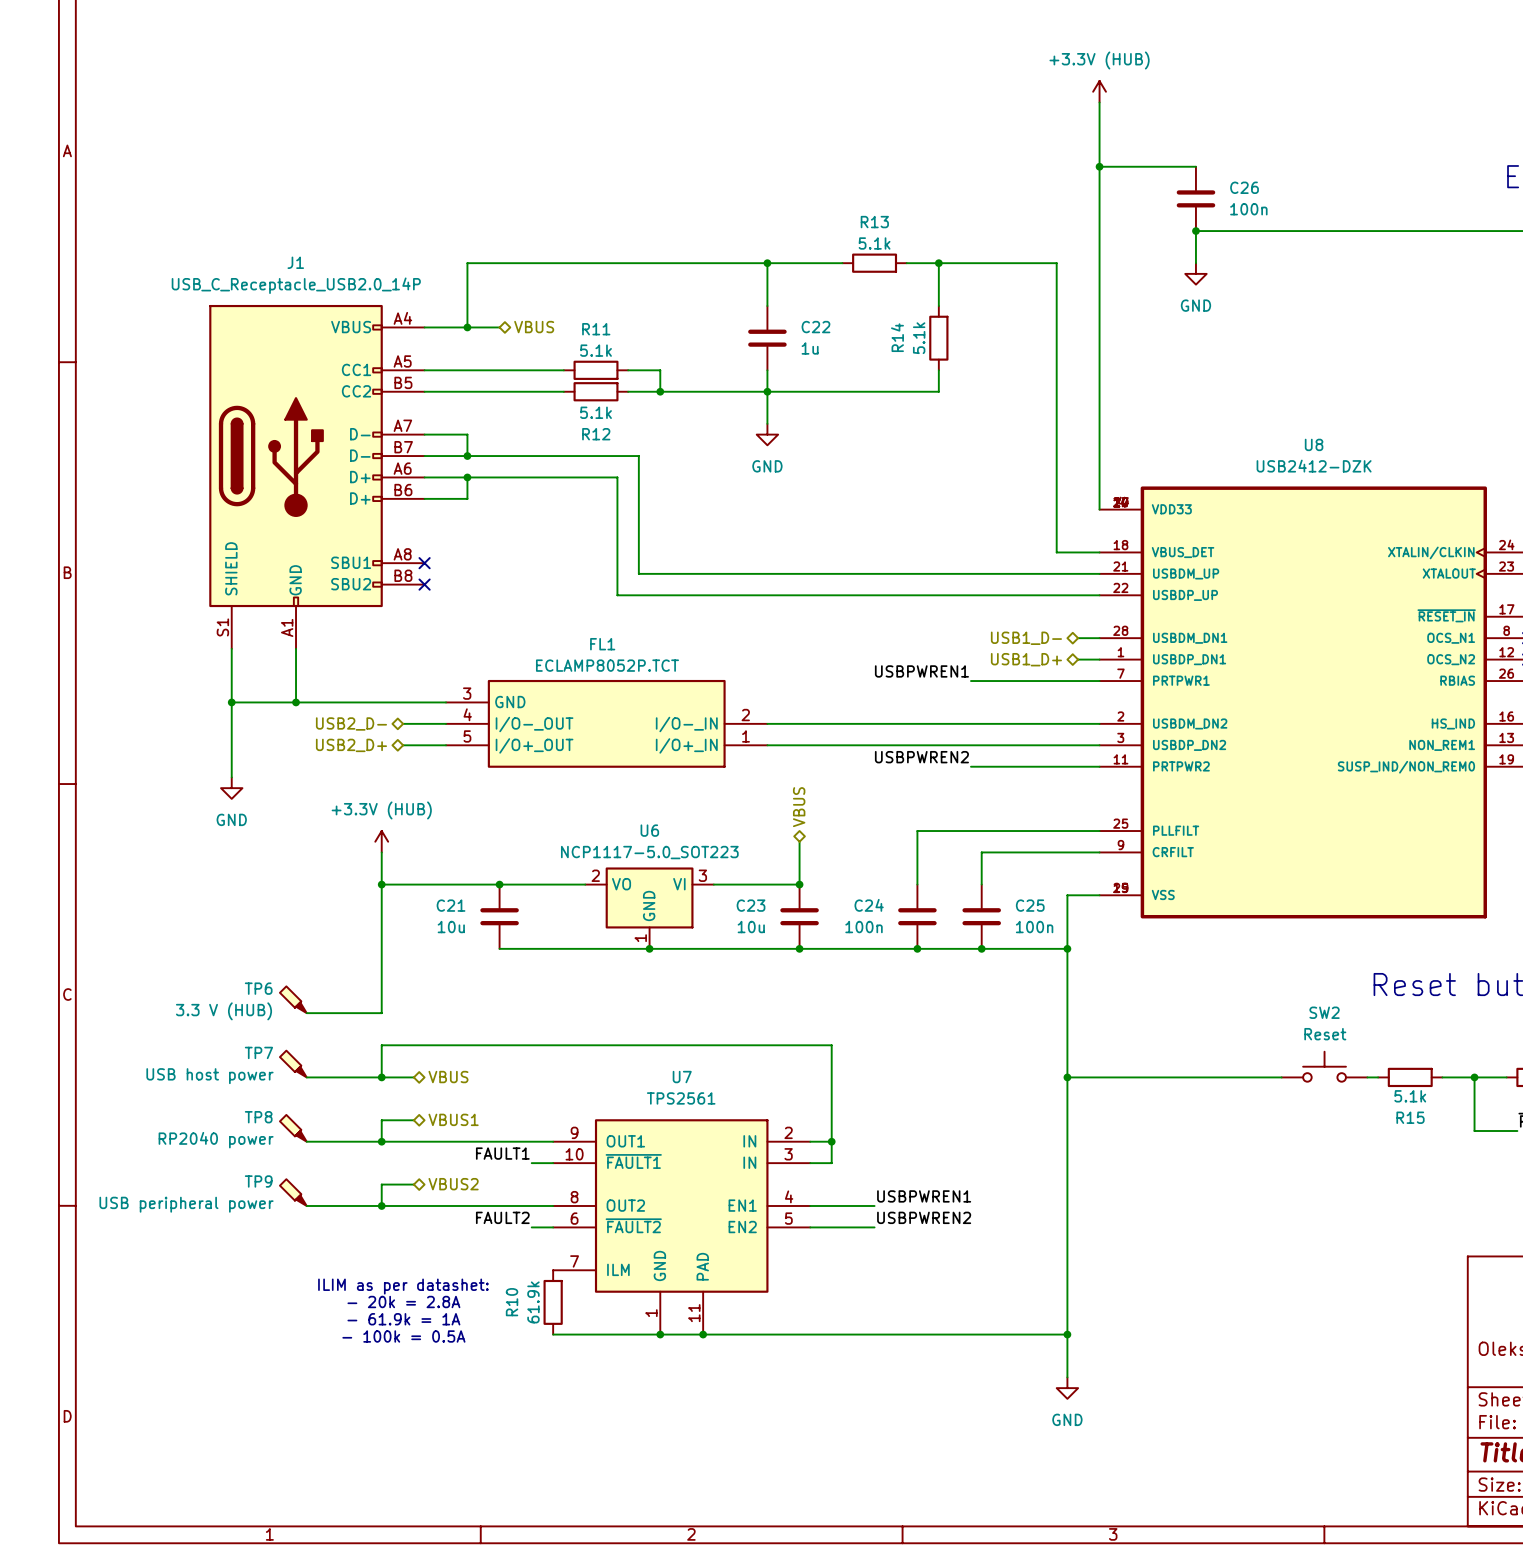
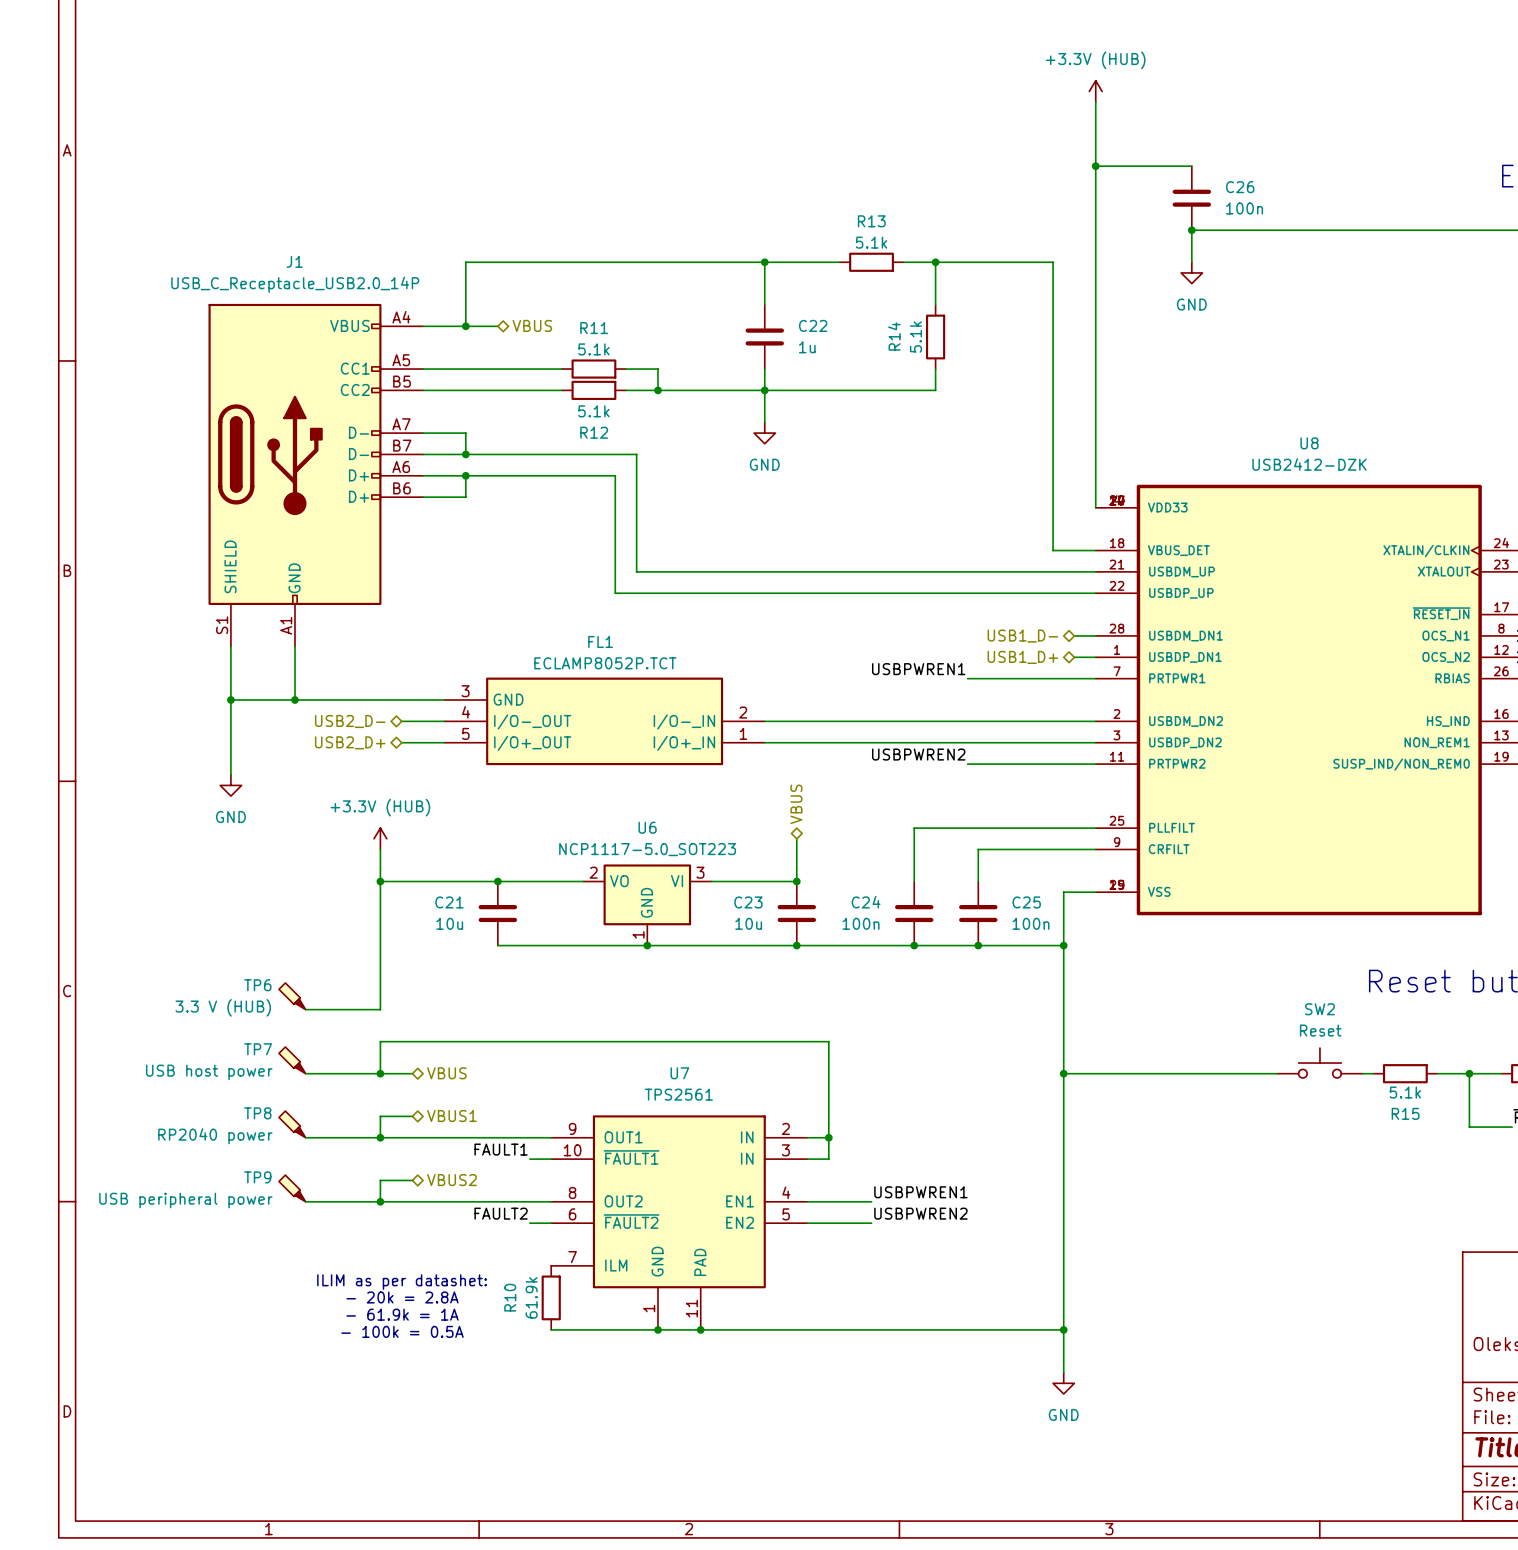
J1 symbol: [209, 304, 425, 649] -> [208, 303, 424, 647]
no-connect mark: (424, 563) -> none
no-connect mark: (424, 584) -> none

